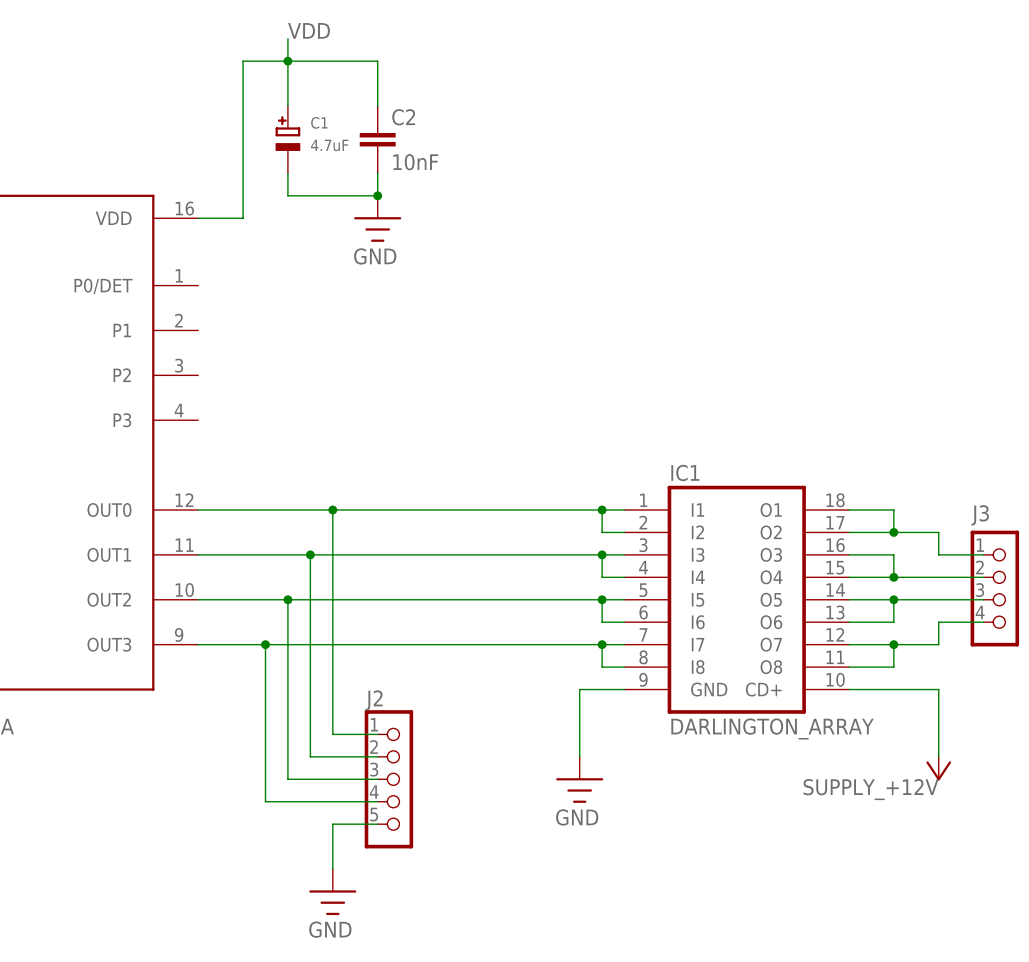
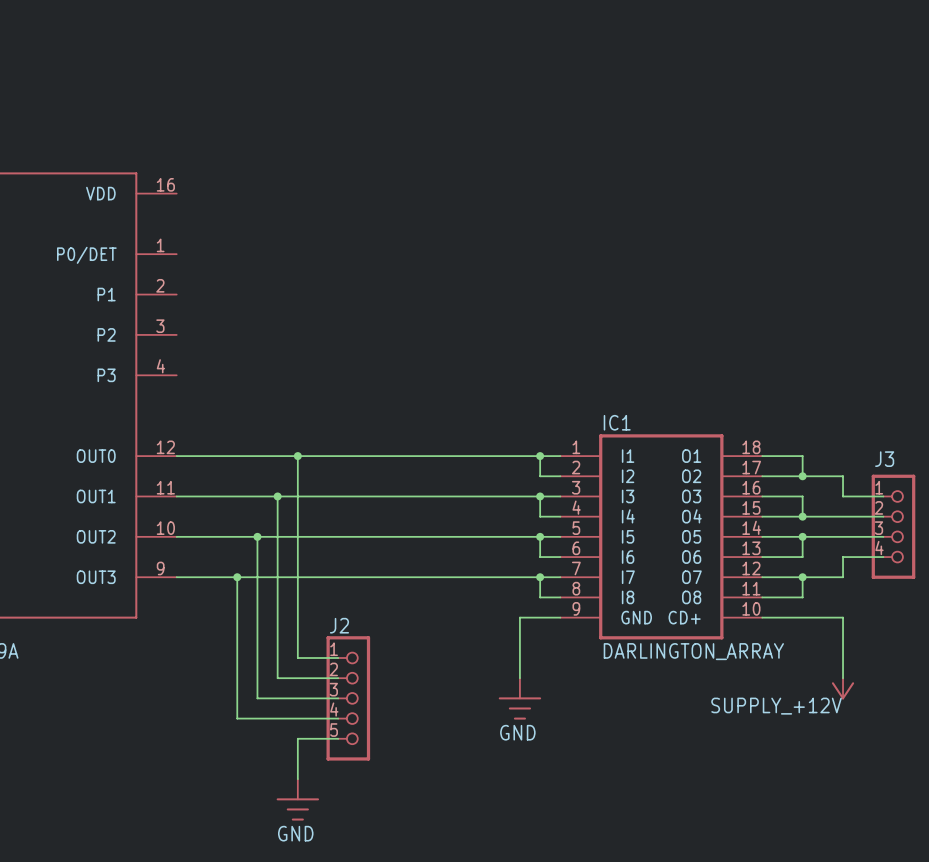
label: VDD (309, 30) -> none
wire: (287, 38) (287, 106) -> none
junction: (287, 61) -> none
wire: (377, 106) (377, 61) (243, 61) (243, 218) (198, 218) -> none
C1: 4.7uF (287, 139) -> none
C2: 10nF (377, 139) -> none
wire: (287, 173) (287, 195) (377, 195) (377, 173) -> none
junction: (377, 195) -> none
power symbol: GND (377, 218) -> none

